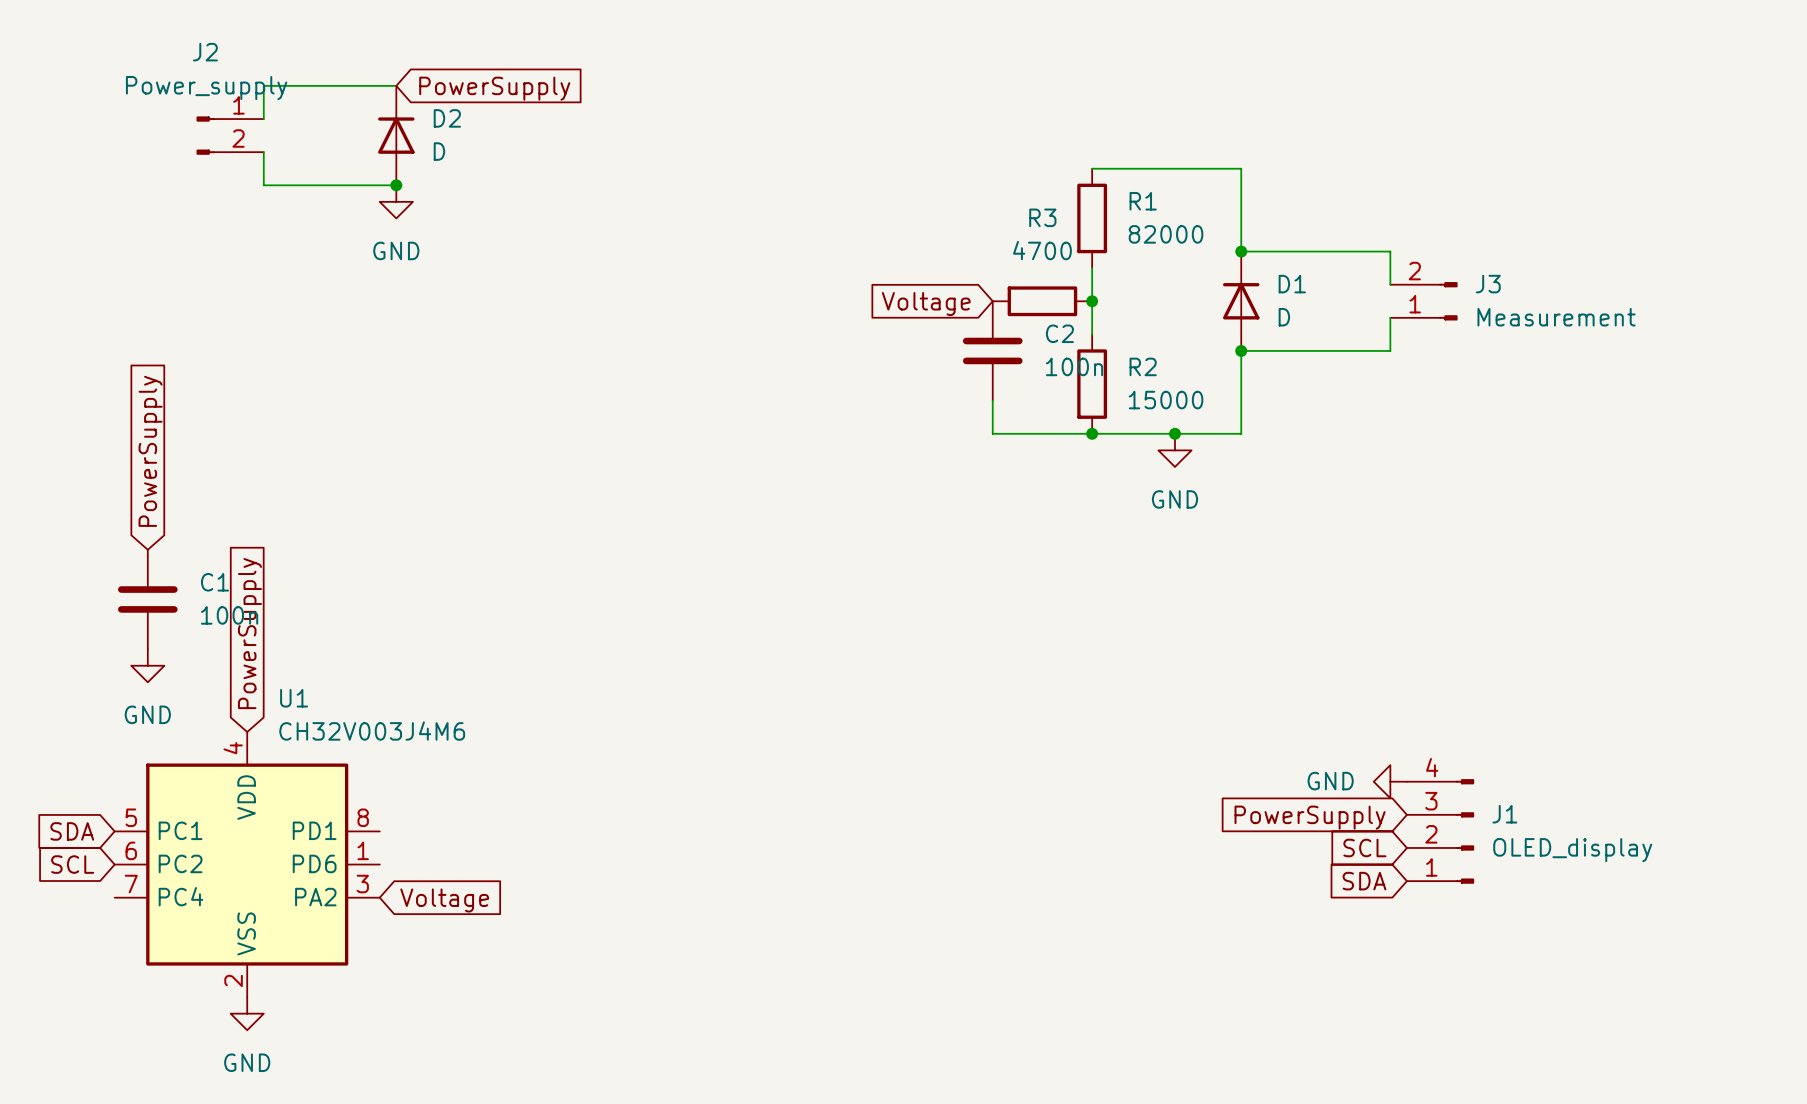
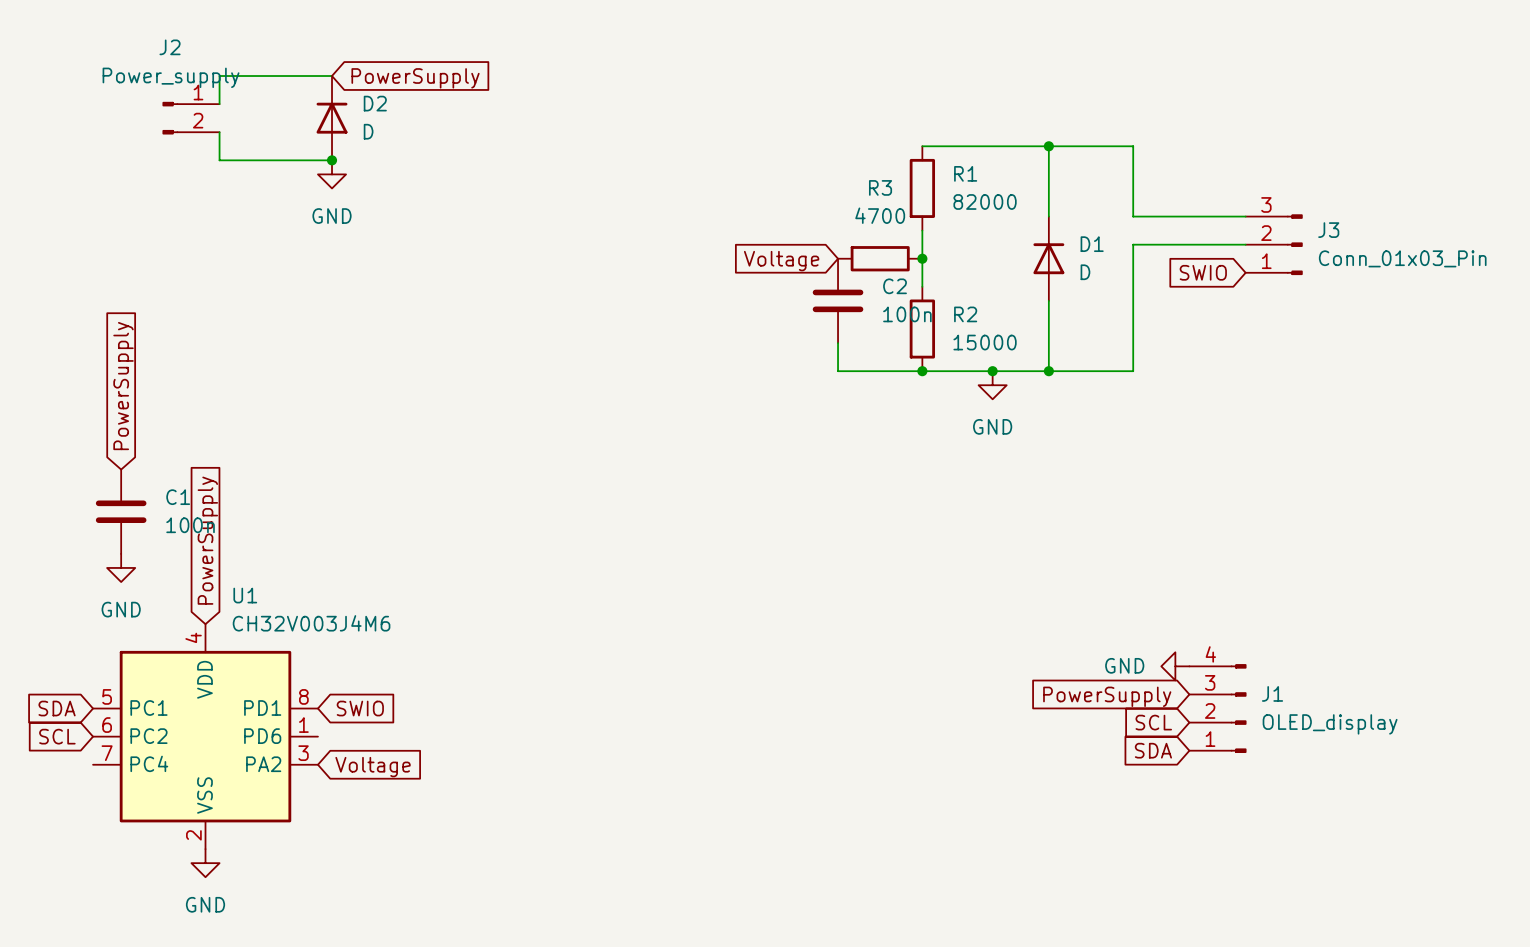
junction: none -> (1048, 146)
wire: (1241, 251) (1340, 251) -> (1048, 146) (1133, 146) (1133, 216)
junction: (1241, 251) -> none
wire: (1390, 251) (1390, 284) -> (1175, 216) (1245, 216)
J3 symbol: [1390, 282, 1458, 321] -> [1245, 214, 1303, 276]
wire: none -> (1245, 244) (1133, 244) (1133, 371) (1048, 371)
wire: (1390, 317) (1390, 350) (1241, 350) -> none
global label: none -> SWIO (1203, 272)
J3 value: Measurement (1556, 317) -> Conn_01x03_Pin (1402, 258)
junction: (1241, 350) -> none
junction: none -> (1048, 371)
global label: none -> SWIO (360, 708)

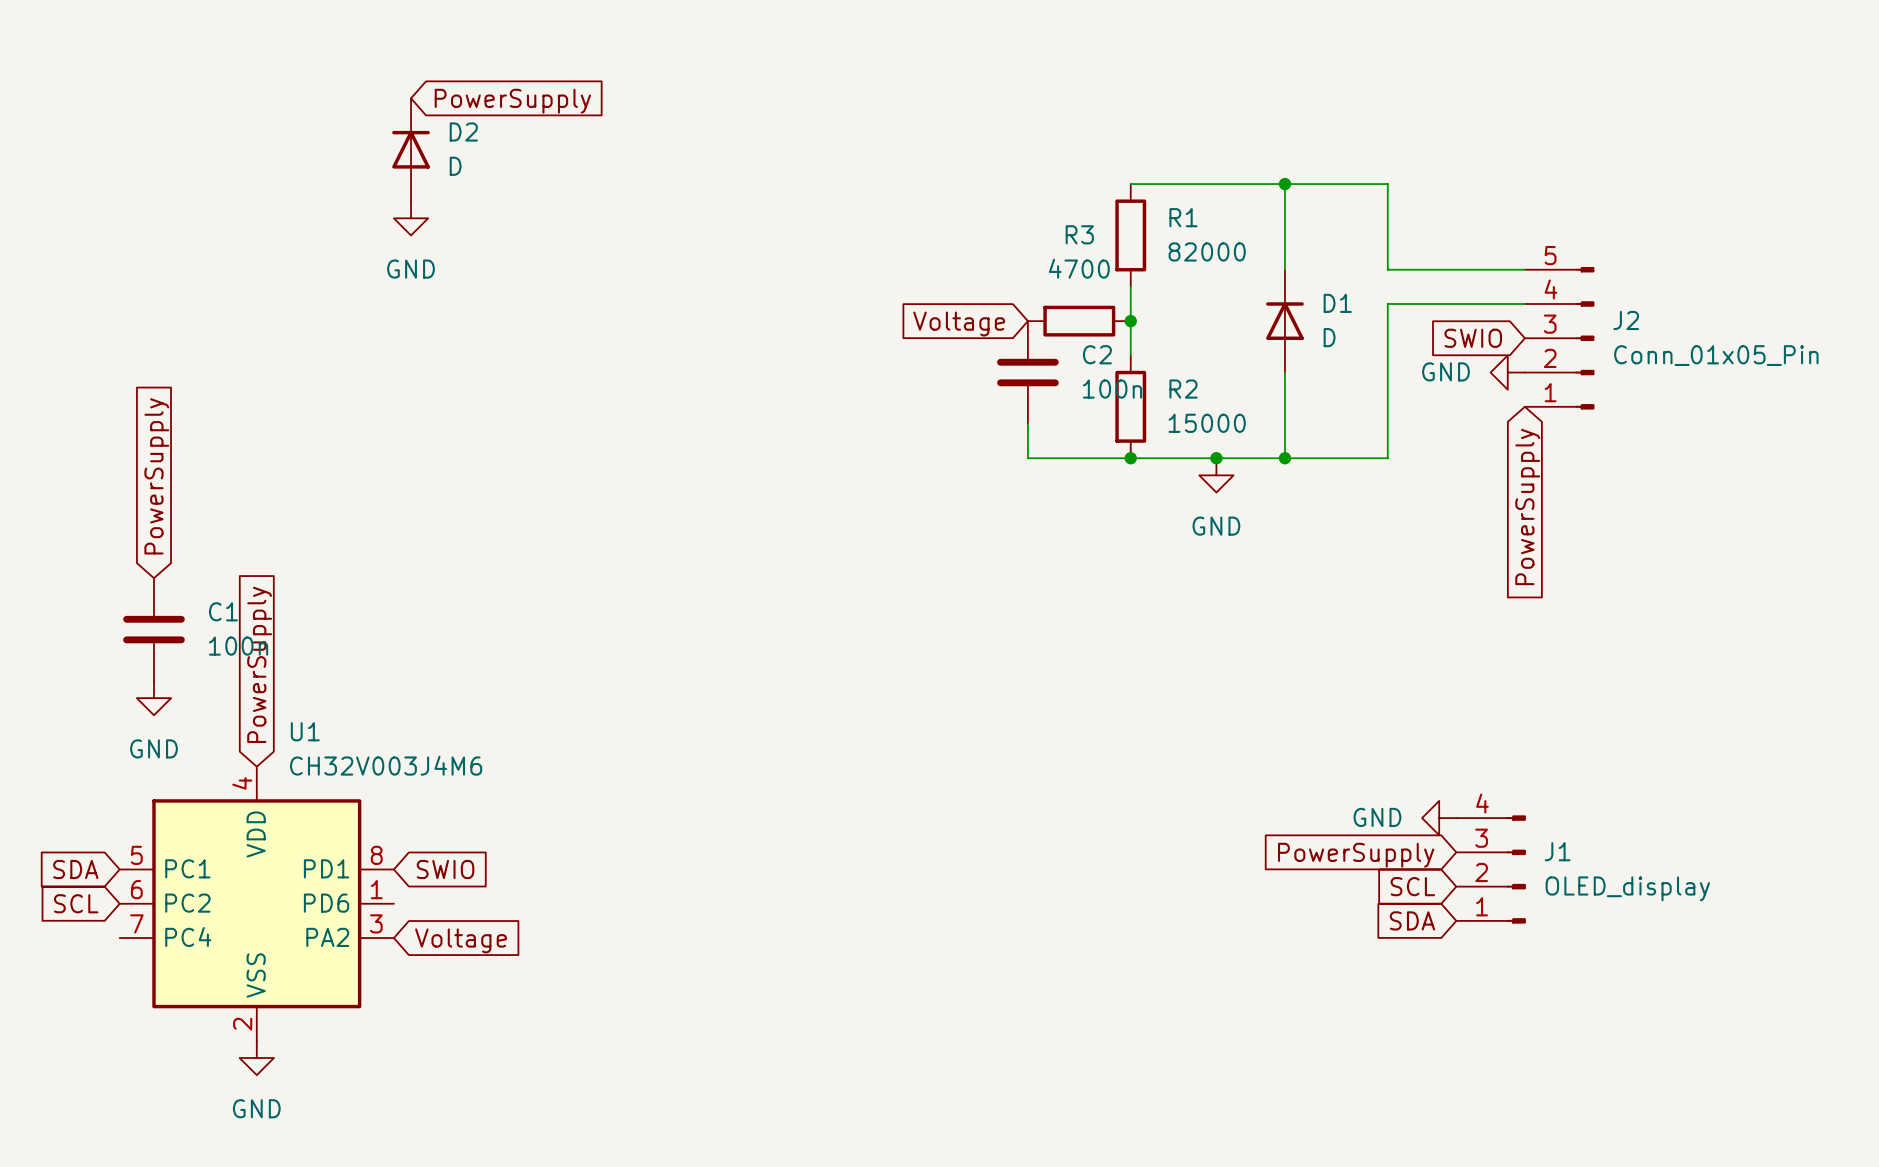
J2 name position: J2 (170, 47) -> J2 (1626, 320)
wire: (332, 76) (219, 76) (219, 104) -> none
J2 value: Power_supply (171, 77) -> Conn_01x05_Pin (1716, 355)
J2 symbol: [162, 101, 220, 135] -> [1524, 266, 1595, 410]
wire: (219, 132) (219, 160) (332, 160) -> none
junction: (332, 160) -> none
J3: Conn_01x03_Pin (1274, 244) -> none
power symbol: none -> GND (1507, 372)
global label: none -> PowerSupply (1527, 507)

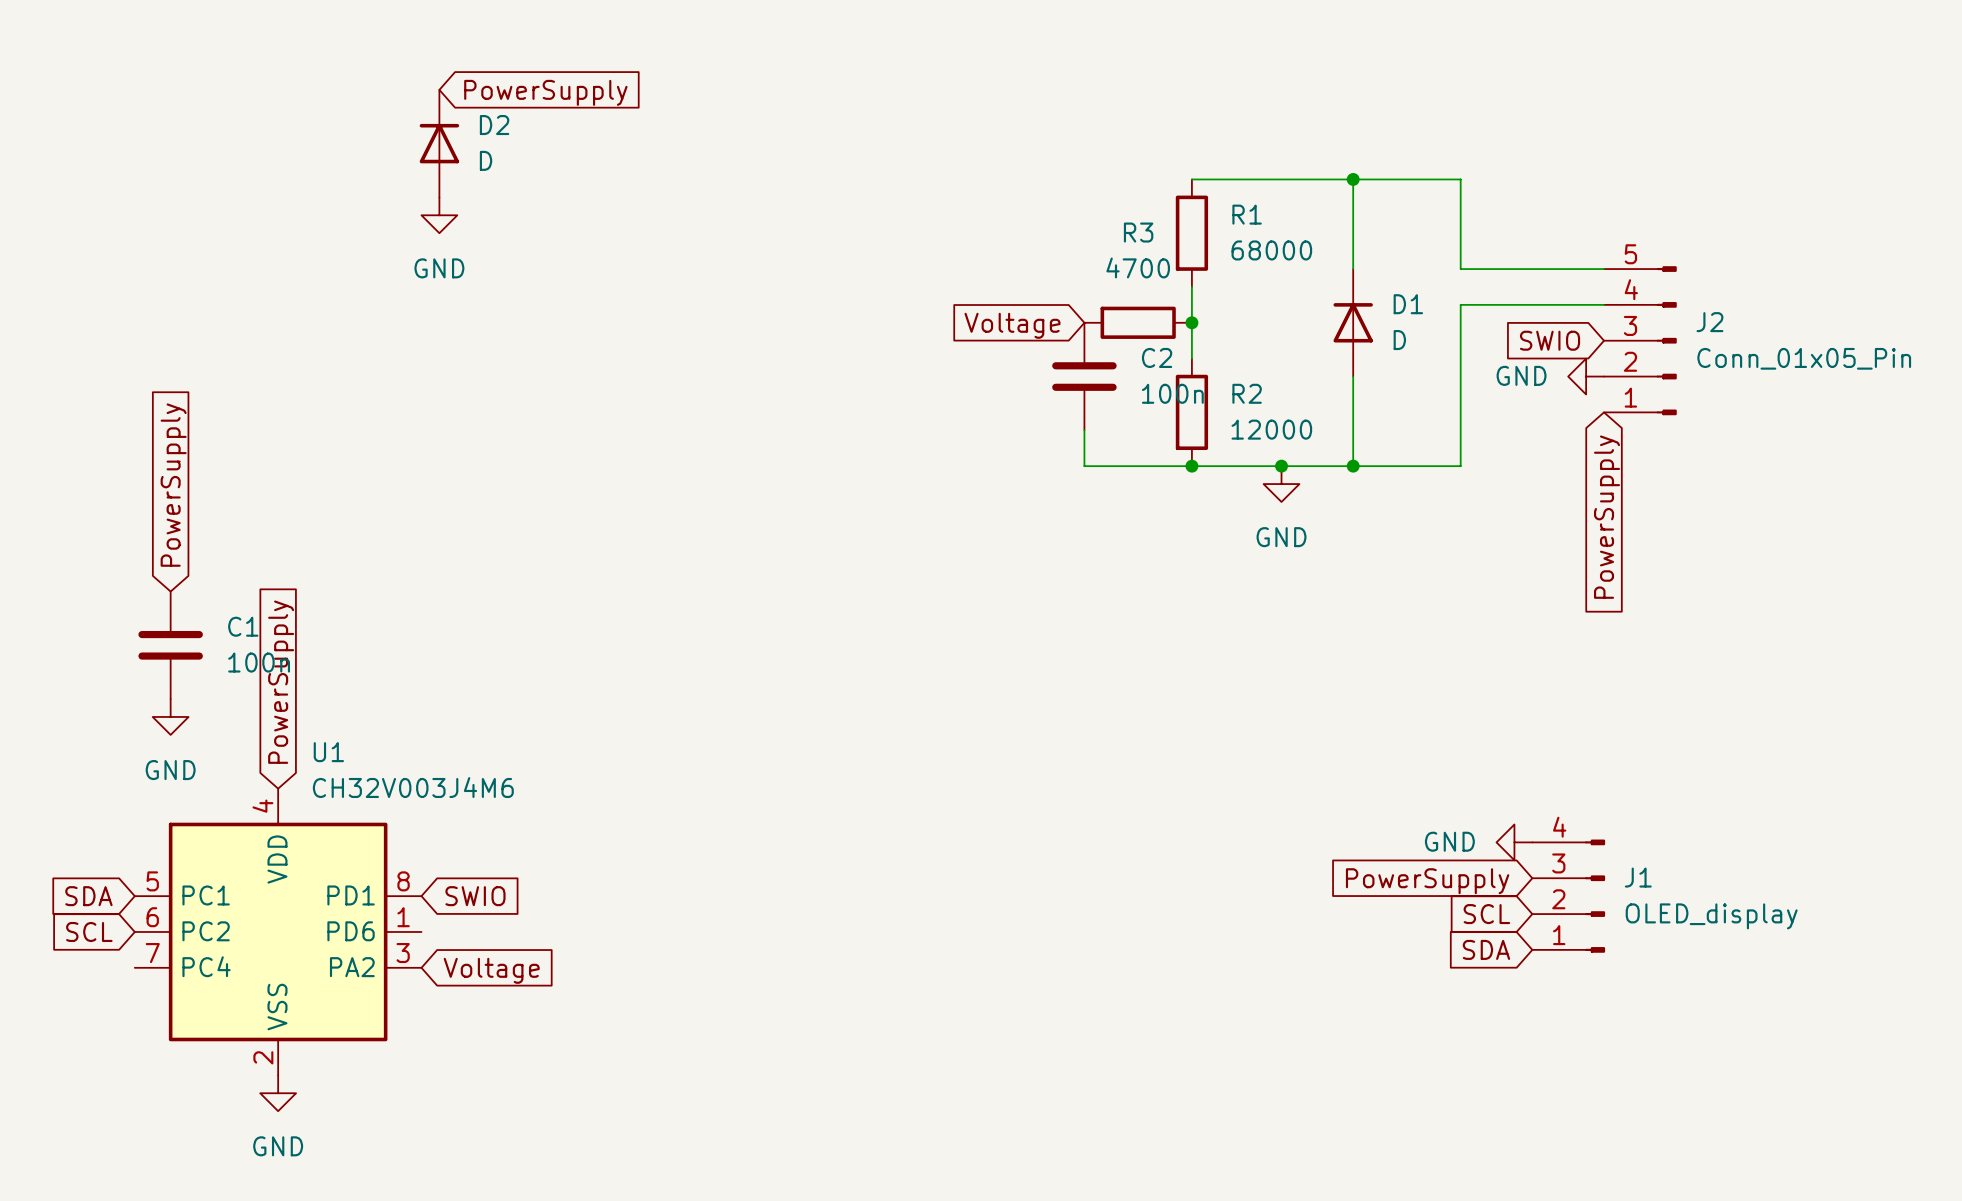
R1 value: 82000 (1207, 251) -> 68000 (1271, 250)
R2 value: 15000 (1207, 423) -> 12000 (1271, 429)

